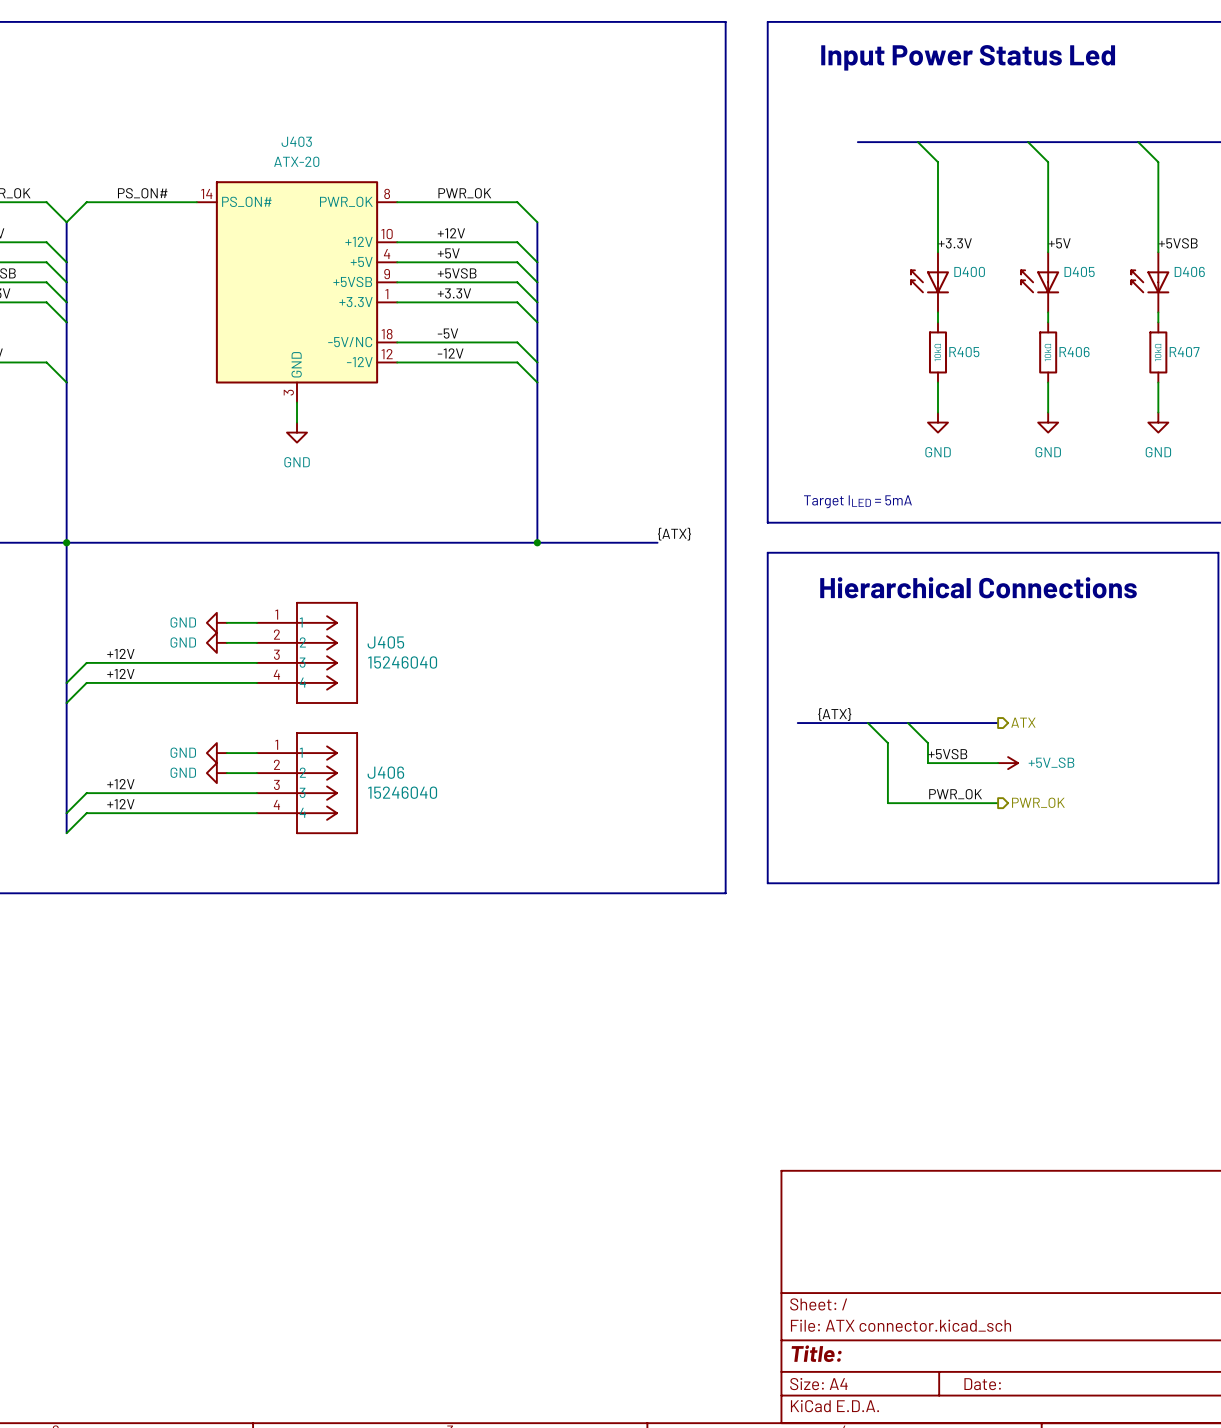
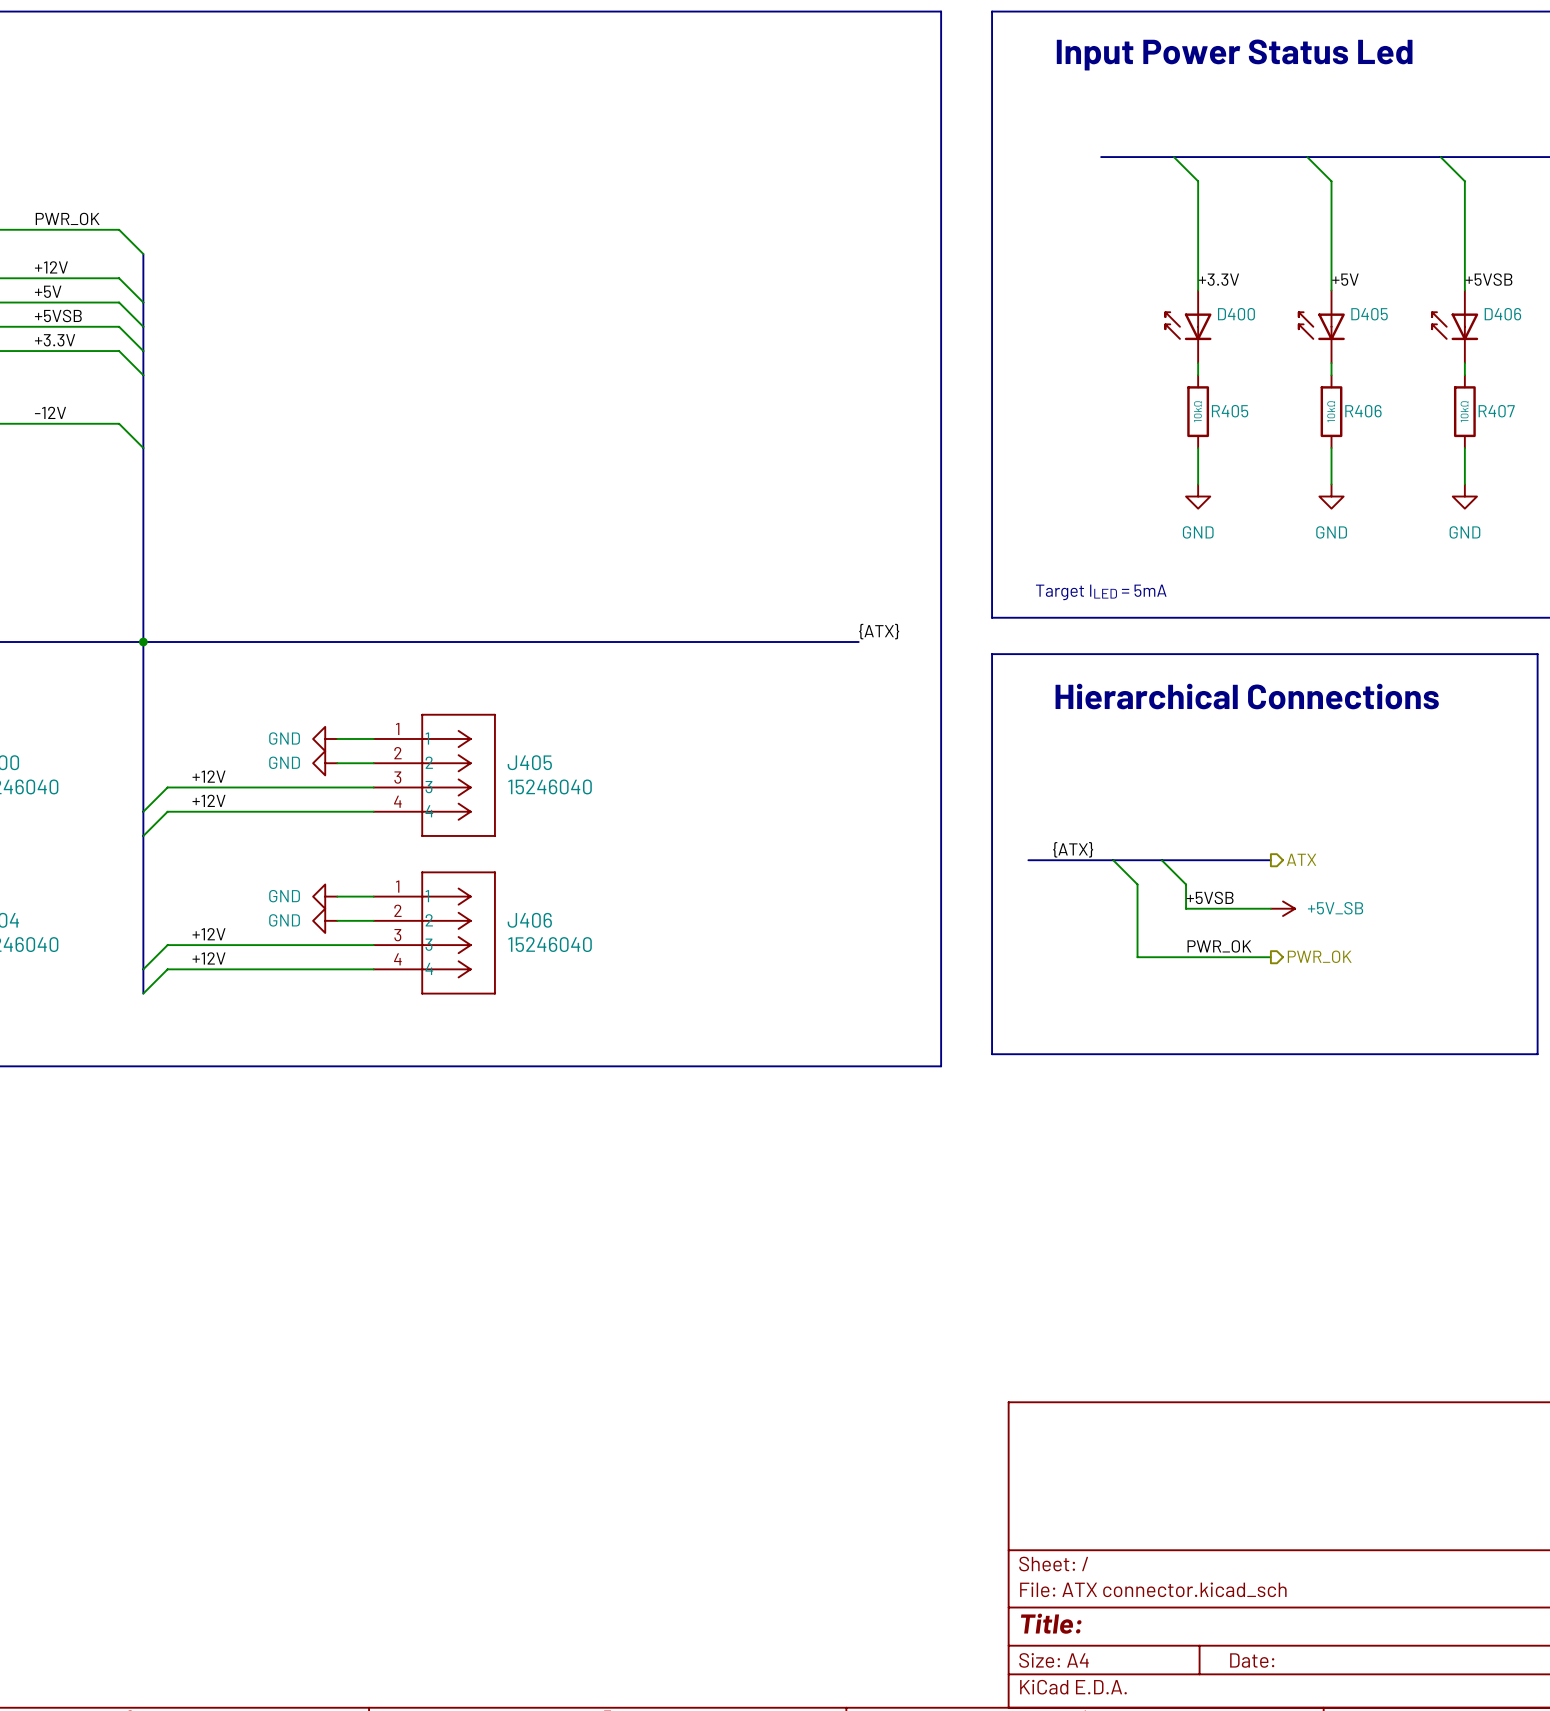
label: PS_ON# (142, 193) -> none
label: PWR_OK (464, 193) -> none
wire: (196, 202) (86, 202) (66, 222) -> none
wire: (397, 202) (517, 202) (537, 222) -> none
bus: (537, 222) (537, 542) -> none
label: +12V (451, 233) -> none
wire: (397, 242) (517, 242) (537, 262) -> none
label: +5V (448, 253) -> none
wire: (397, 262) (517, 262) (537, 282) -> none
label: +5VSB (457, 273) -> none
wire: (397, 282) (517, 282) (537, 302) -> none
J403: ATX-20 (297, 291) -> none
label: +3.3V (454, 293) -> none
wire: (397, 302) (517, 302) (537, 322) -> none
label: -5V (447, 333) -> none
wire: (397, 342) (517, 342) (537, 362) -> none
label: -12V (450, 353) -> none
wire: (397, 362) (517, 362) (537, 382) -> none
wire: (297, 402) (297, 422) -> none
power symbol: GND (297, 432) -> none
junction: (537, 542) -> none

